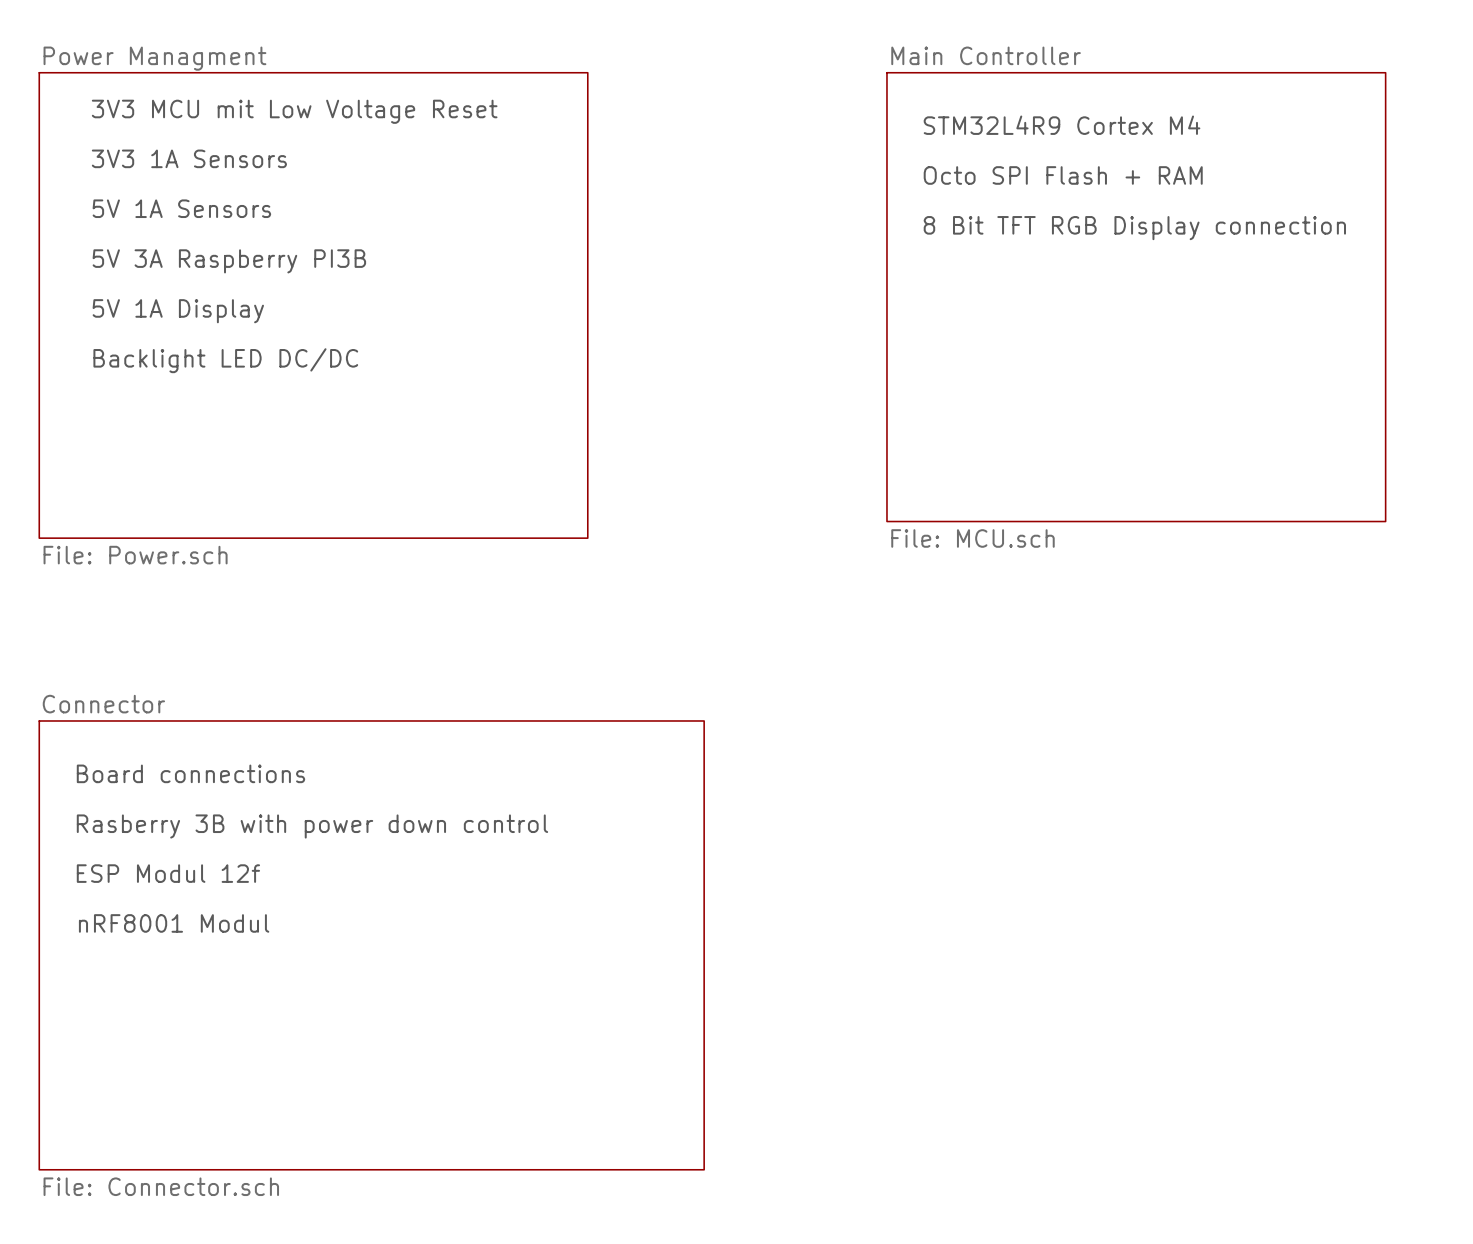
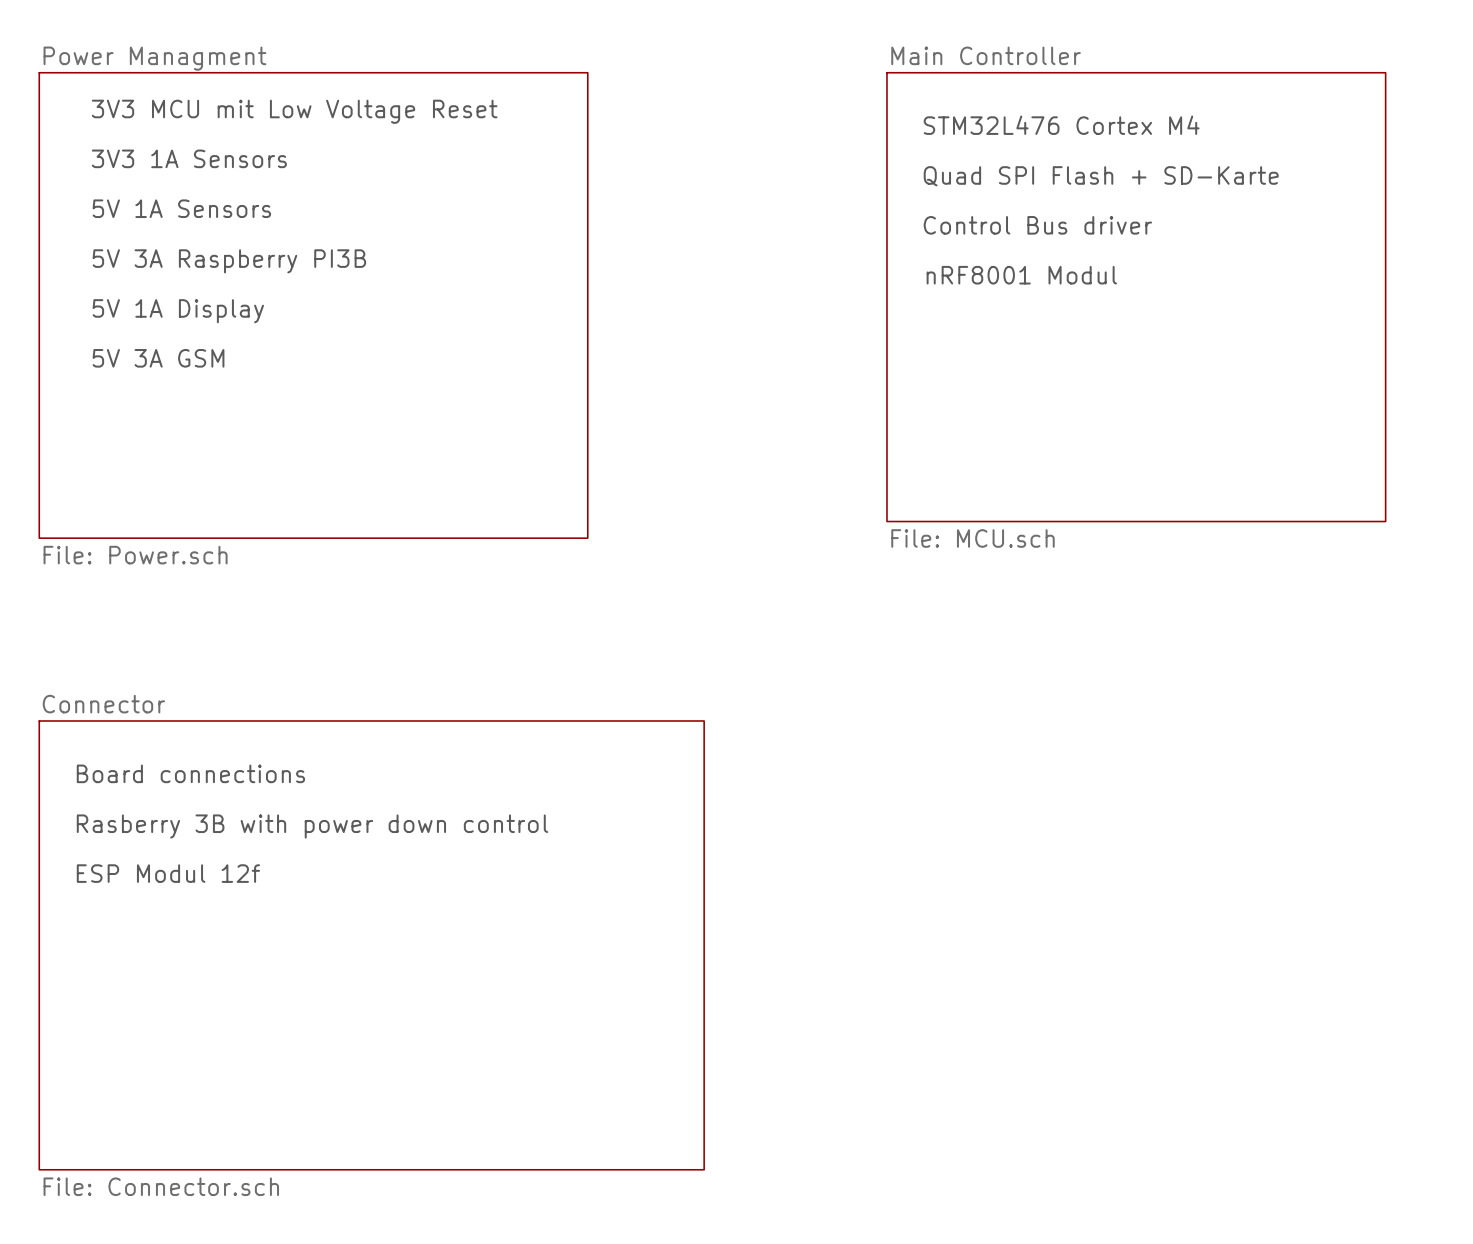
text: STM32L4R9 Cortex M4 (1062, 125) -> STM32L476 Cortex M4 (1061, 125)
text: Octo SPI Flash + RAM (1063, 175) -> Quad SPI Flash + SD-Karte (1101, 176)
text: 8 Bit TFT RGB Display connection (1134, 228) -> Control Bus driver (1037, 225)
text: none -> nRF8001 Modul (1021, 275)
text: Backlight LED DC/DC (225, 360) -> 5V 3A GSM (158, 358)
text: nRF8001 Modul (174, 923) -> none

